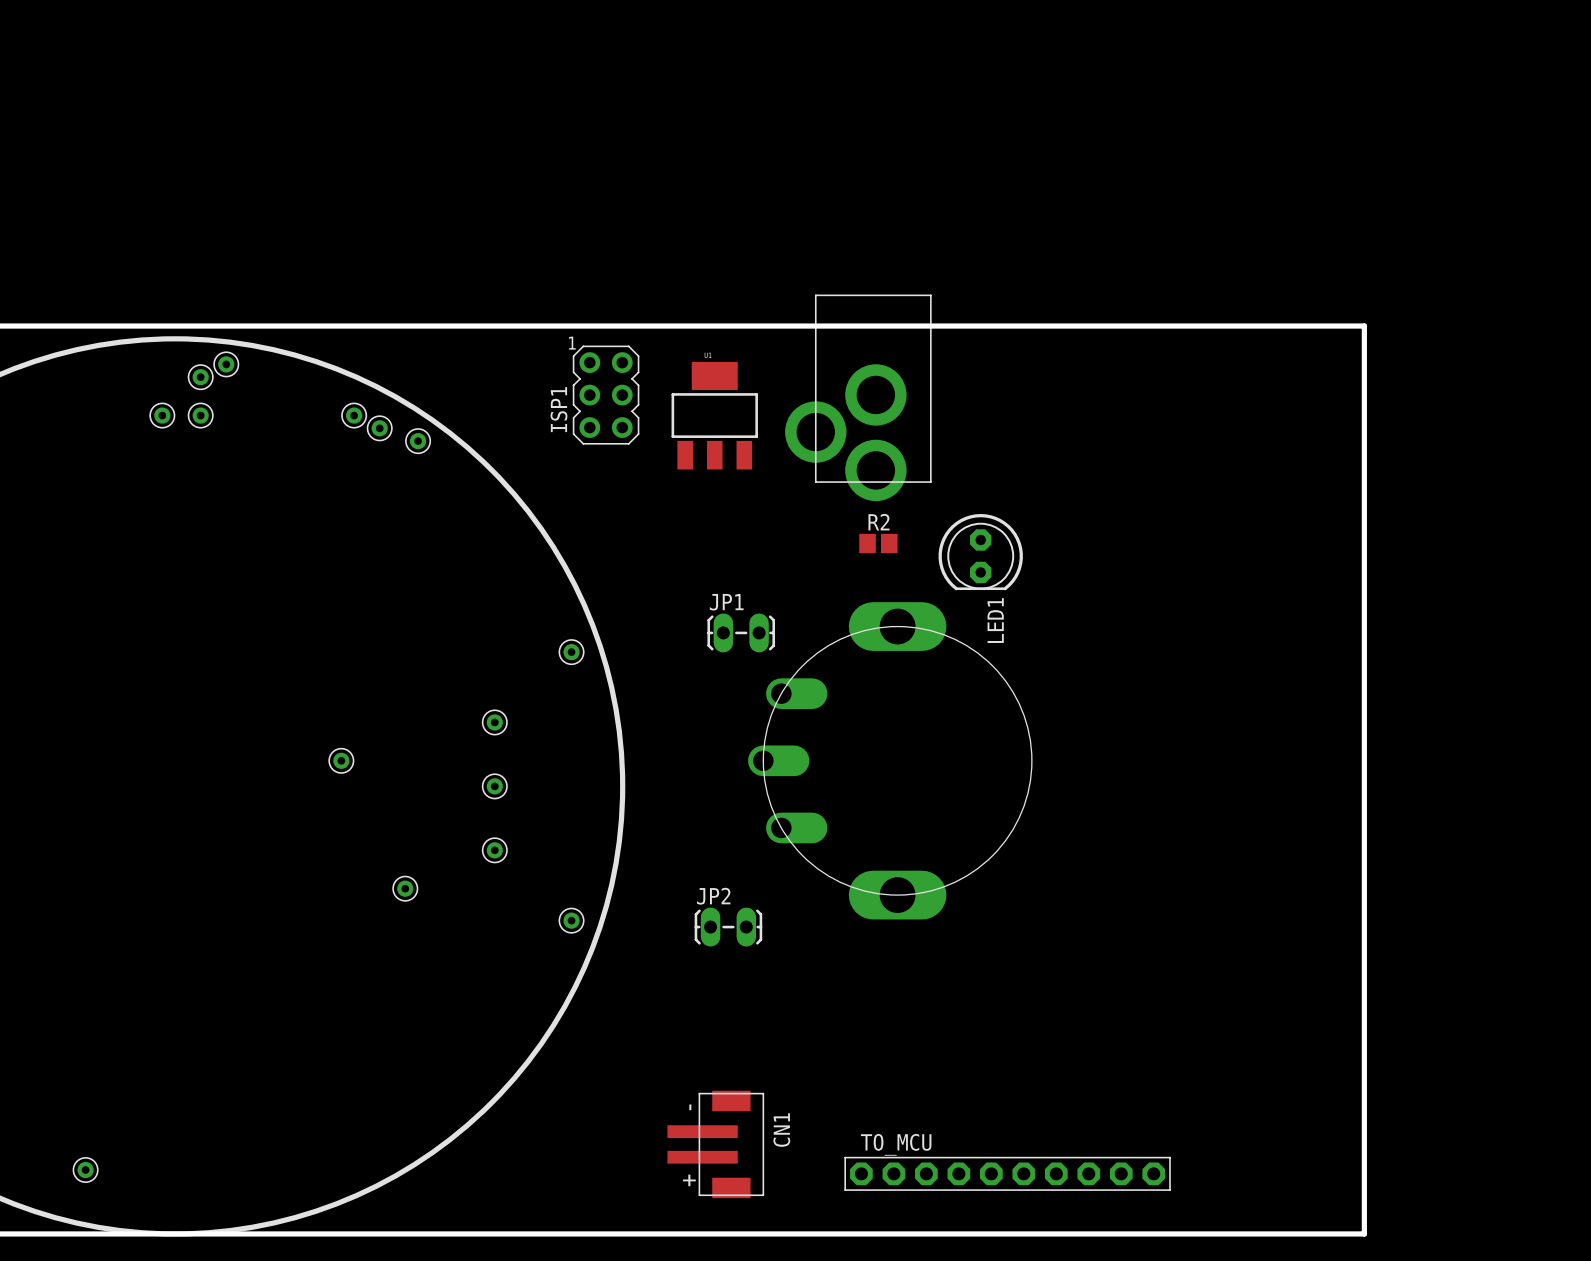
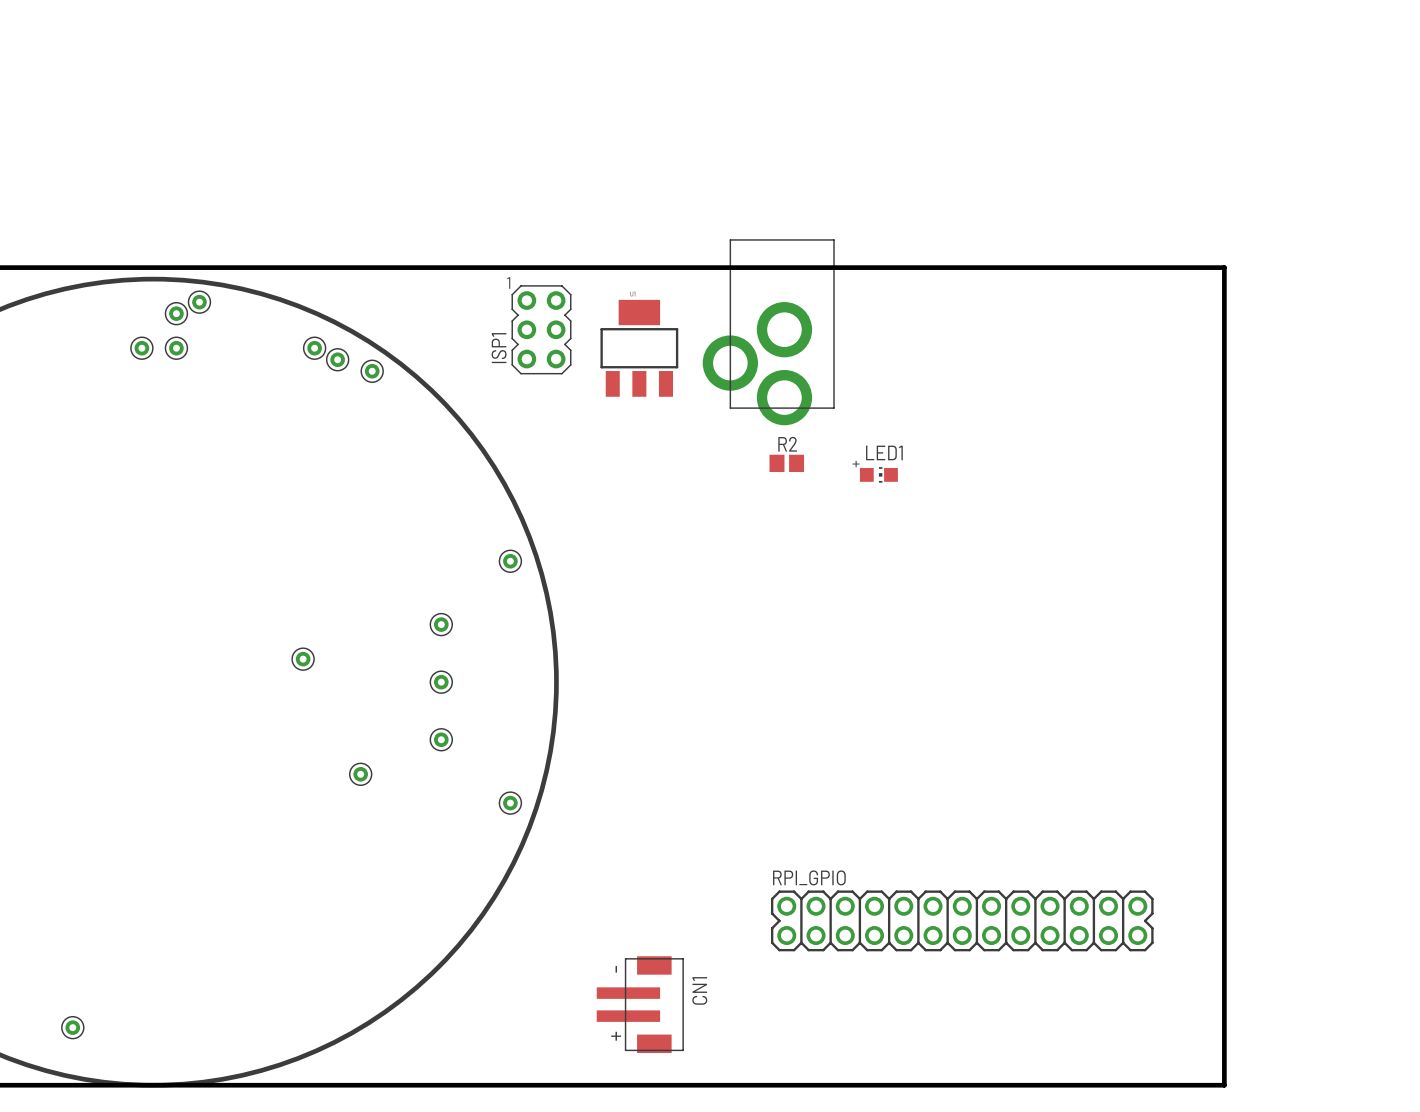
LED1 footprint: [938, 513, 1023, 591] -> [859, 467, 898, 483]
LED1 name position: LED1 (995, 620) -> LED1 (884, 452)
JP1: (741, 632) -> none
part: (890, 760) -> none
JP2: (728, 927) -> none
RPI_GPIO: none -> (962, 920)
TO_MCU: (1007, 1173) -> none

